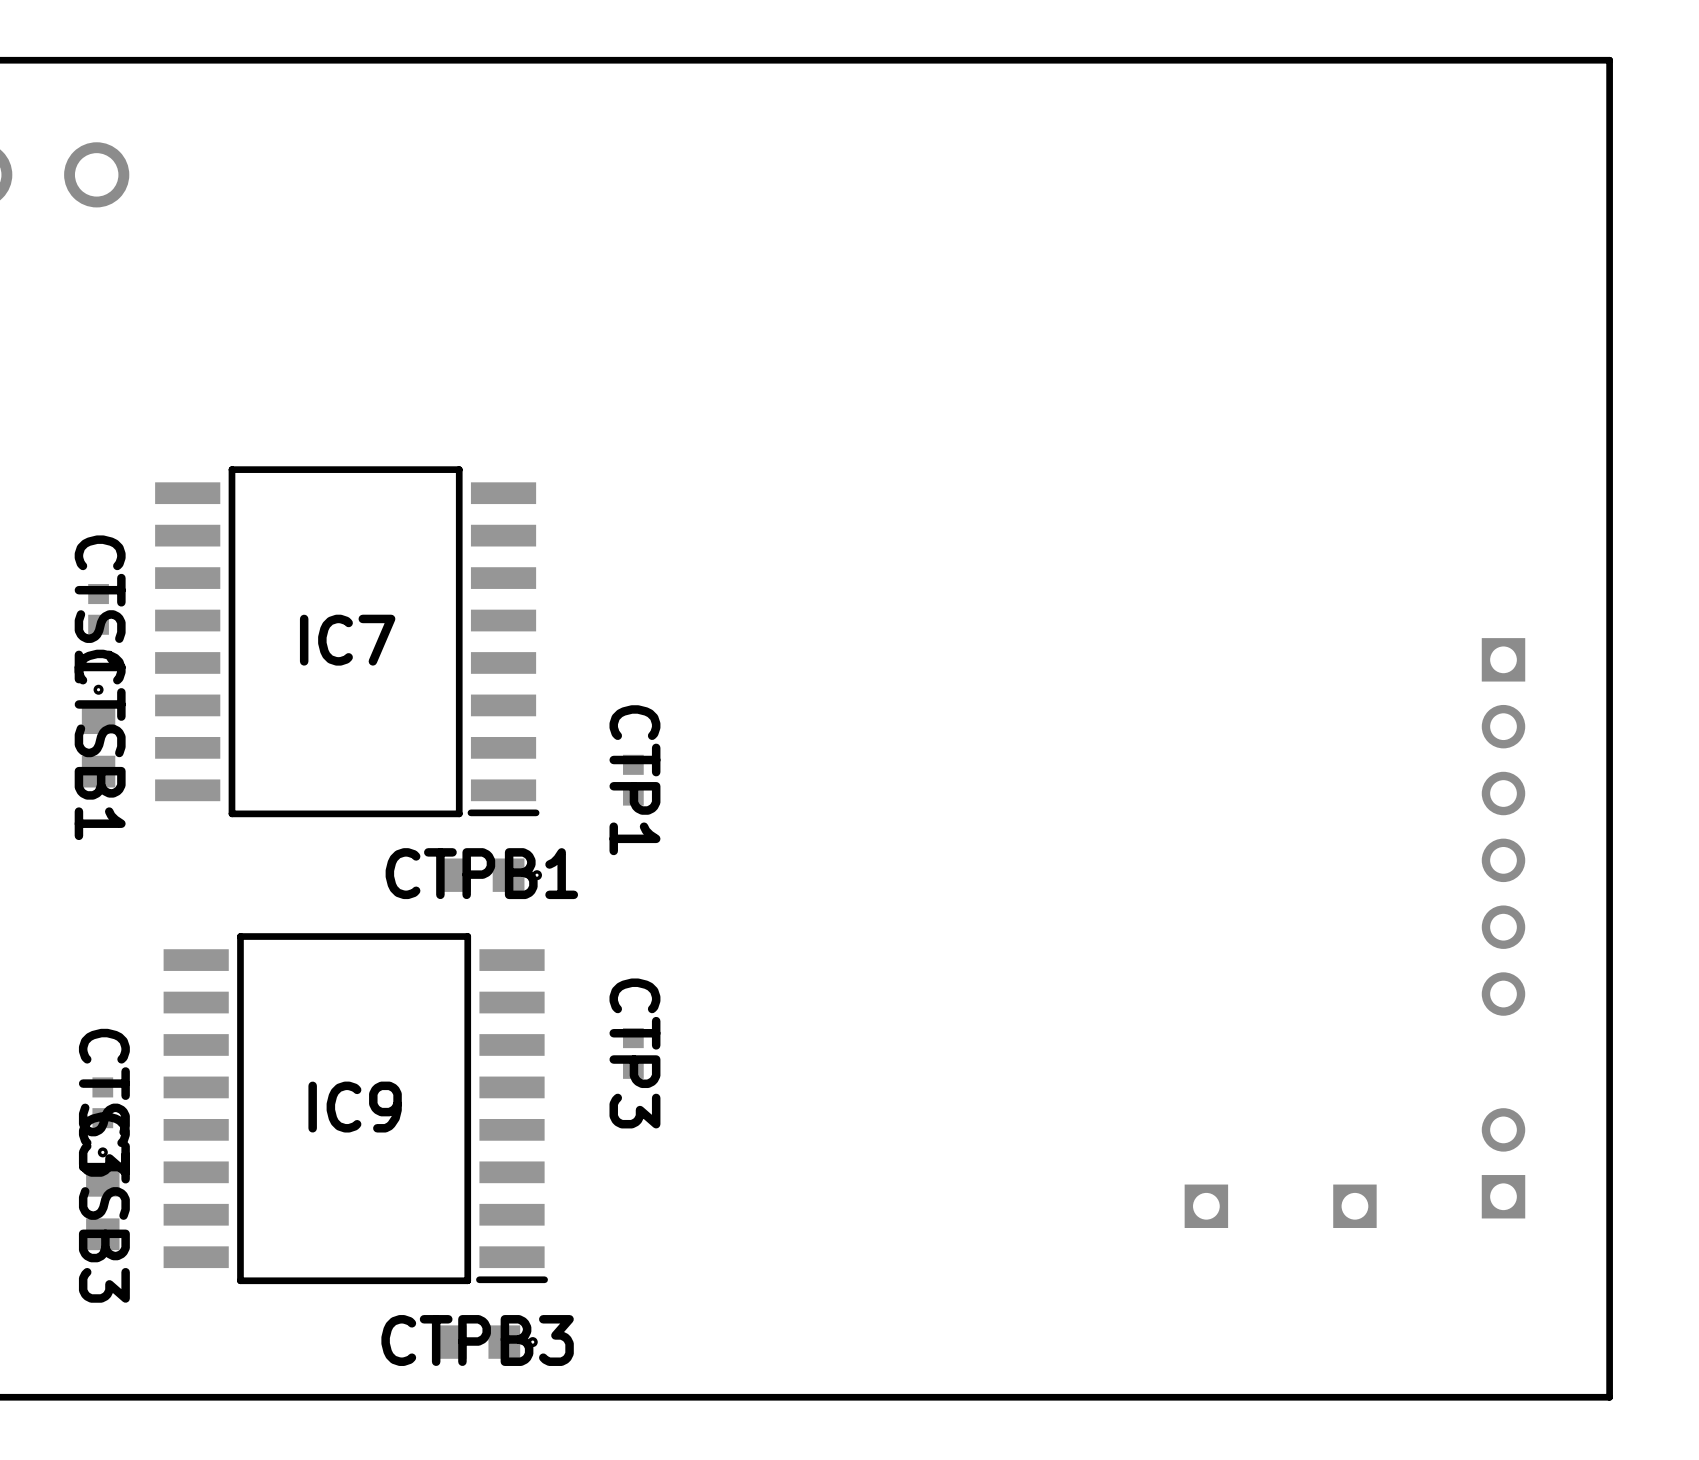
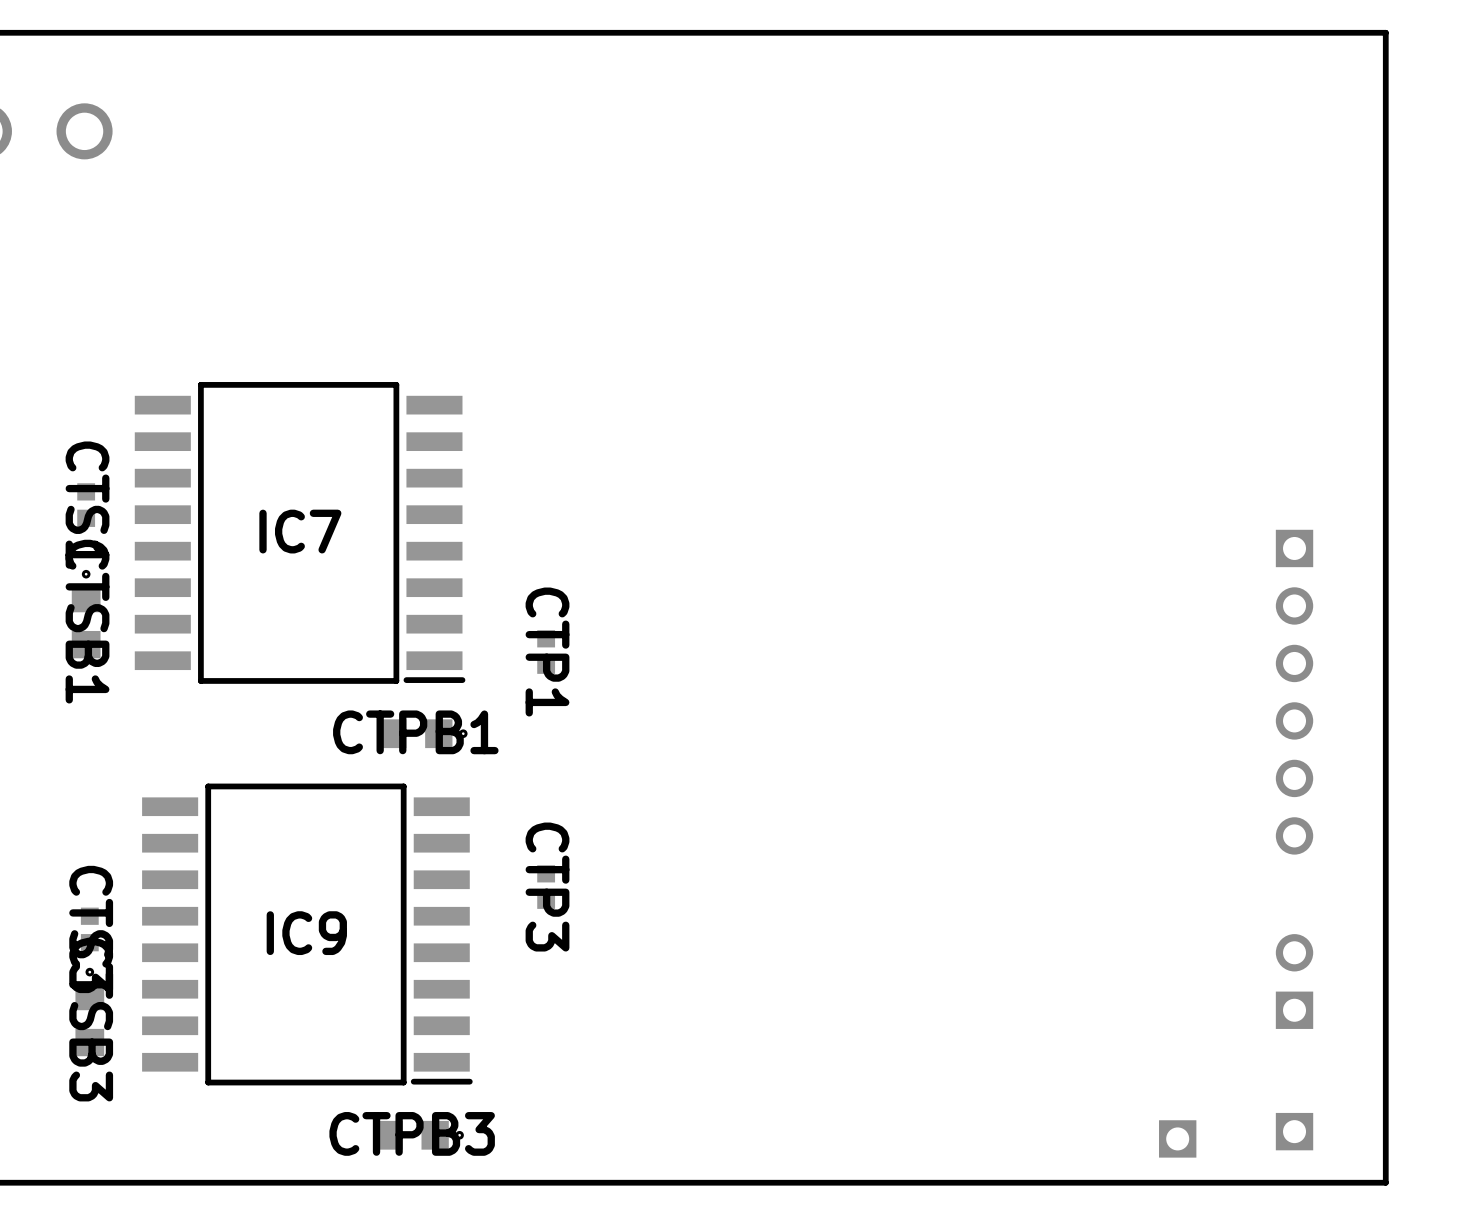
part: (1206, 1206) -> none
part: (1354, 1206) -> none
part: none -> (1294, 1131)
part: none -> (1177, 1138)

